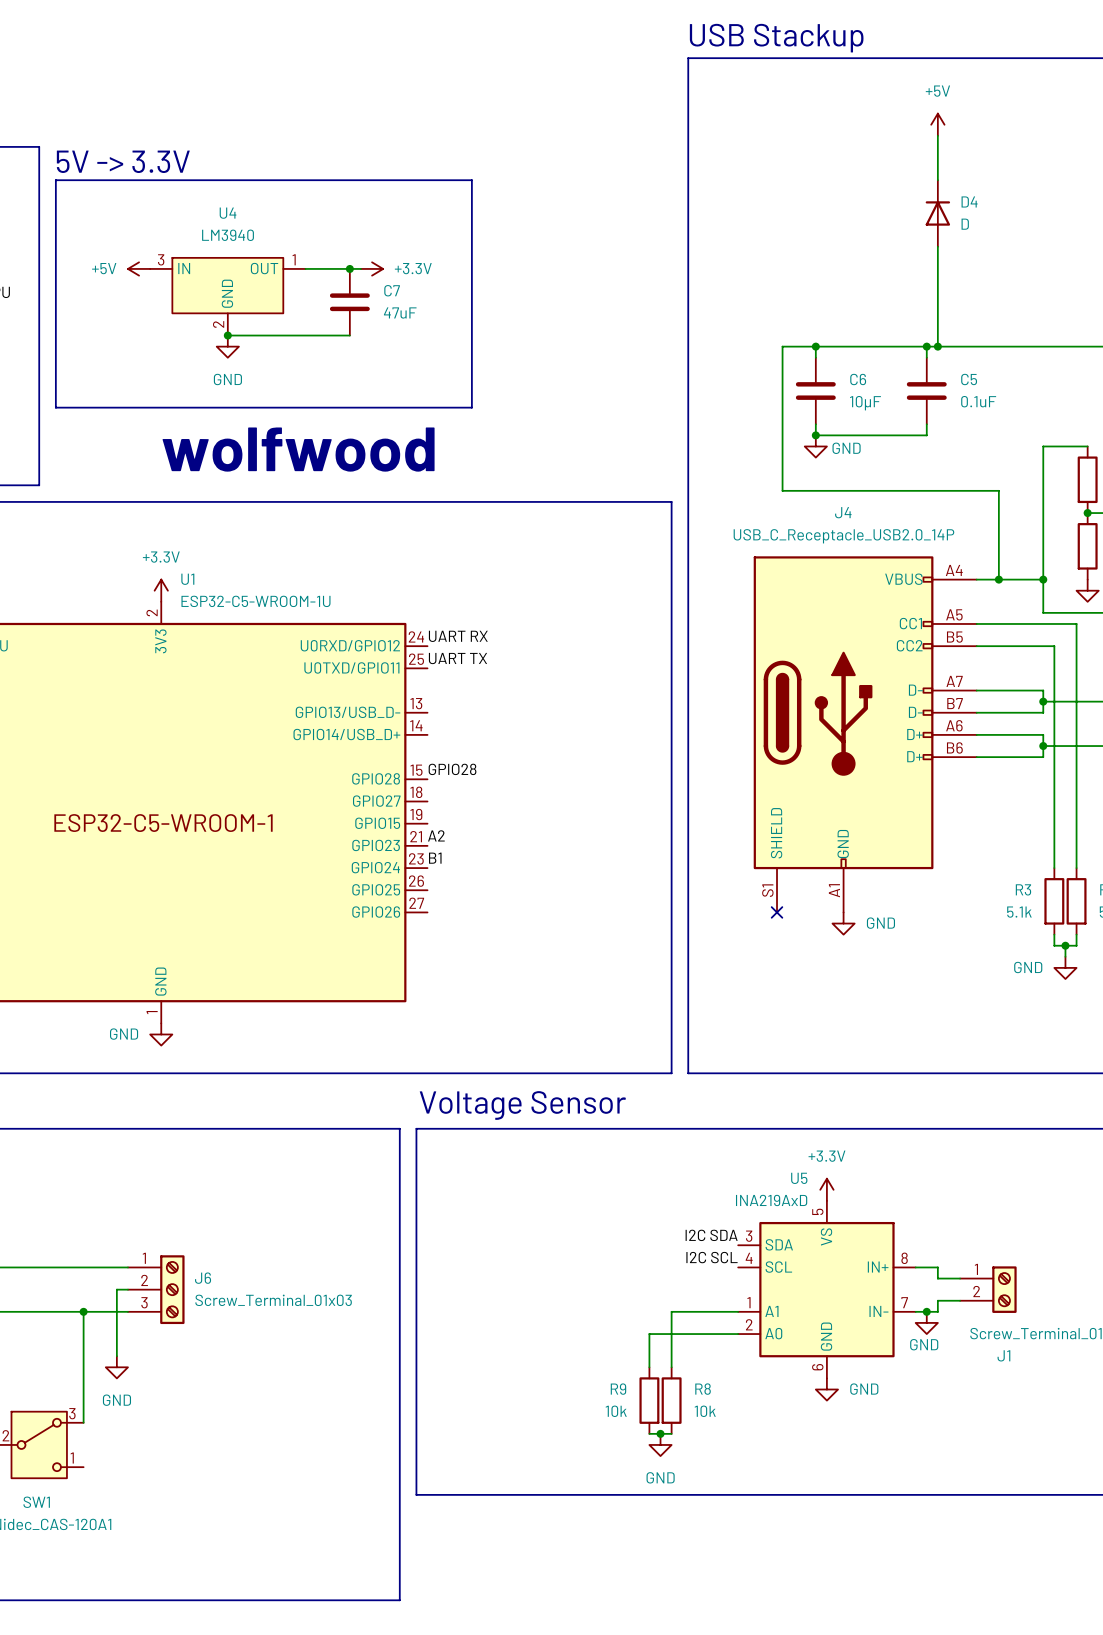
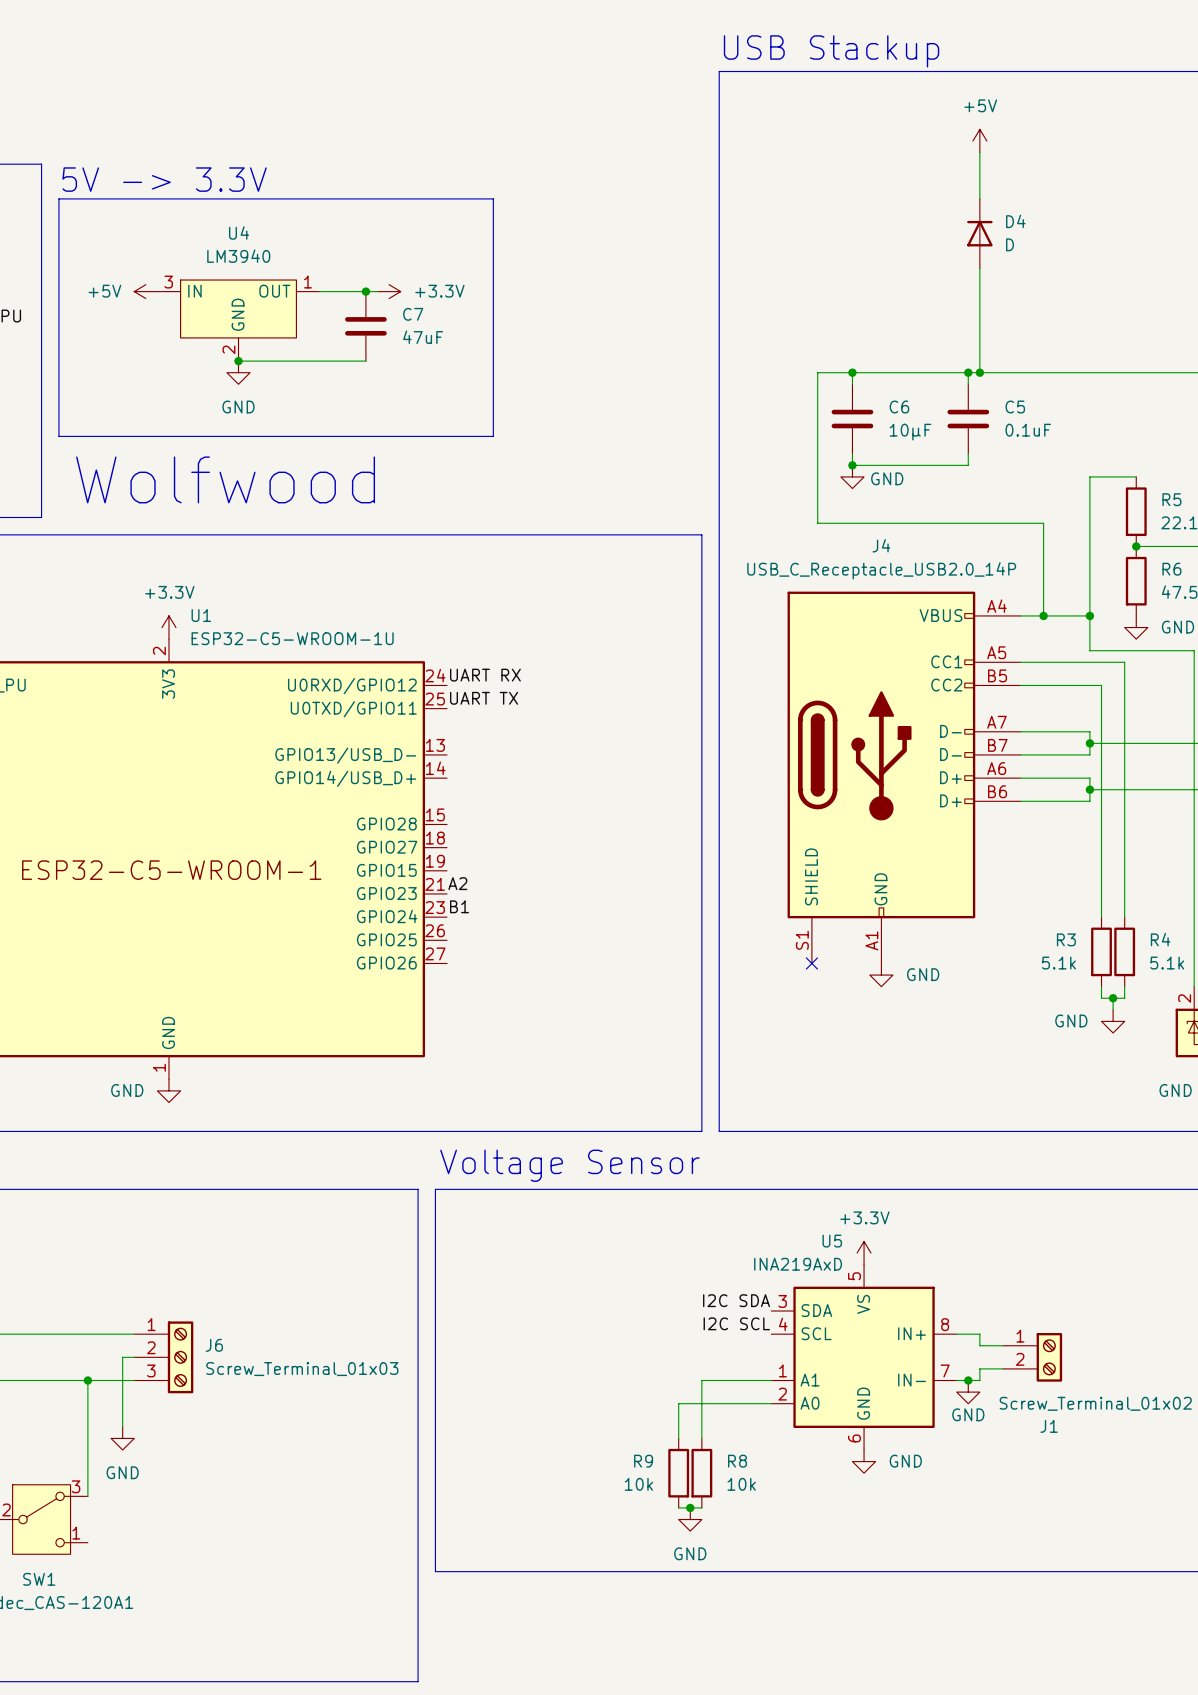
text: wolfwood (298, 449) -> Wolfwood (225, 479)
label: GPIO28 (452, 769) -> none

